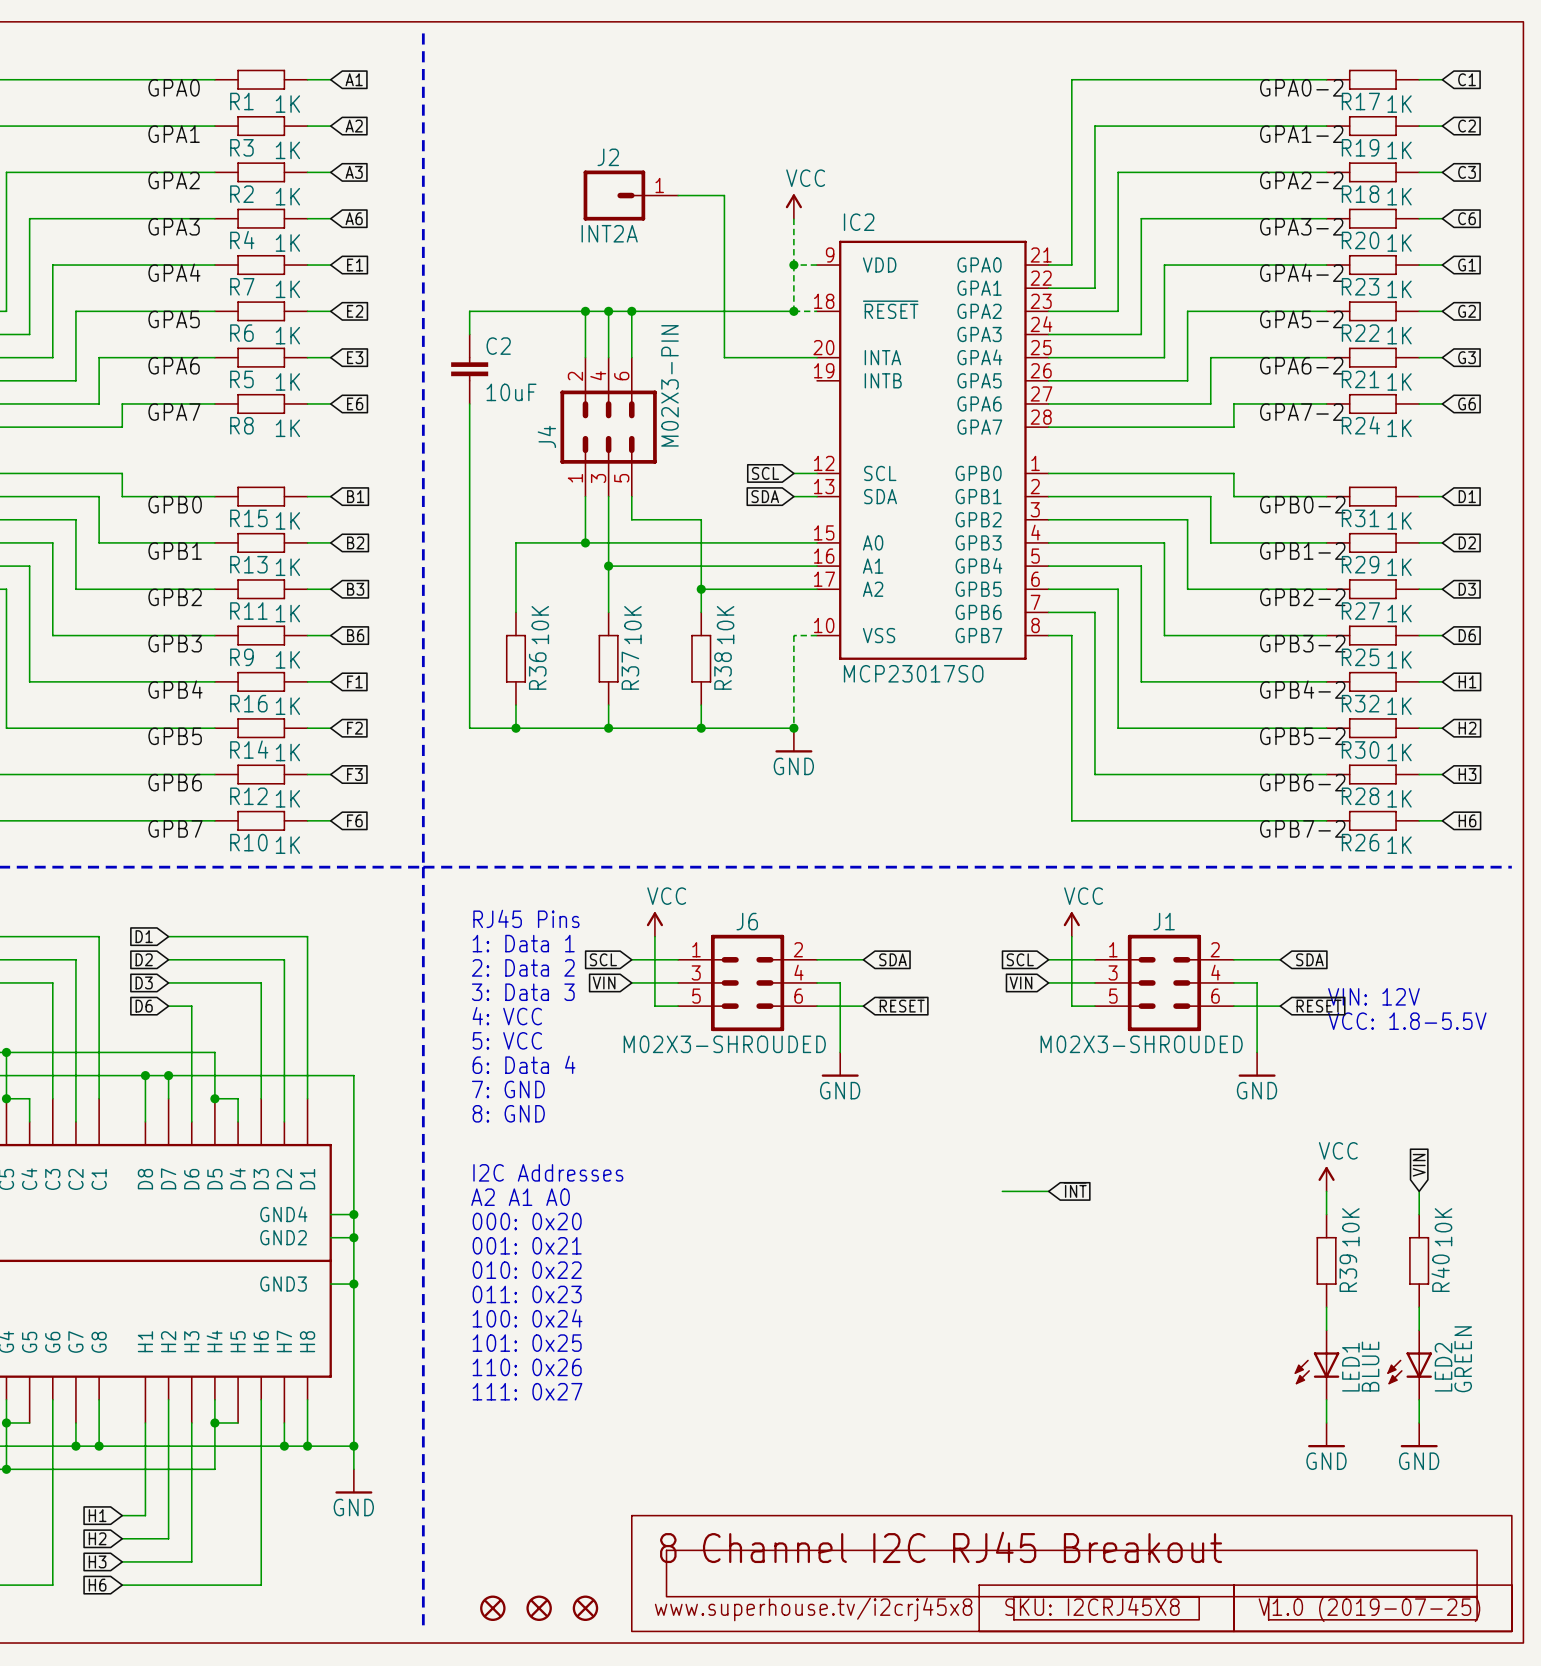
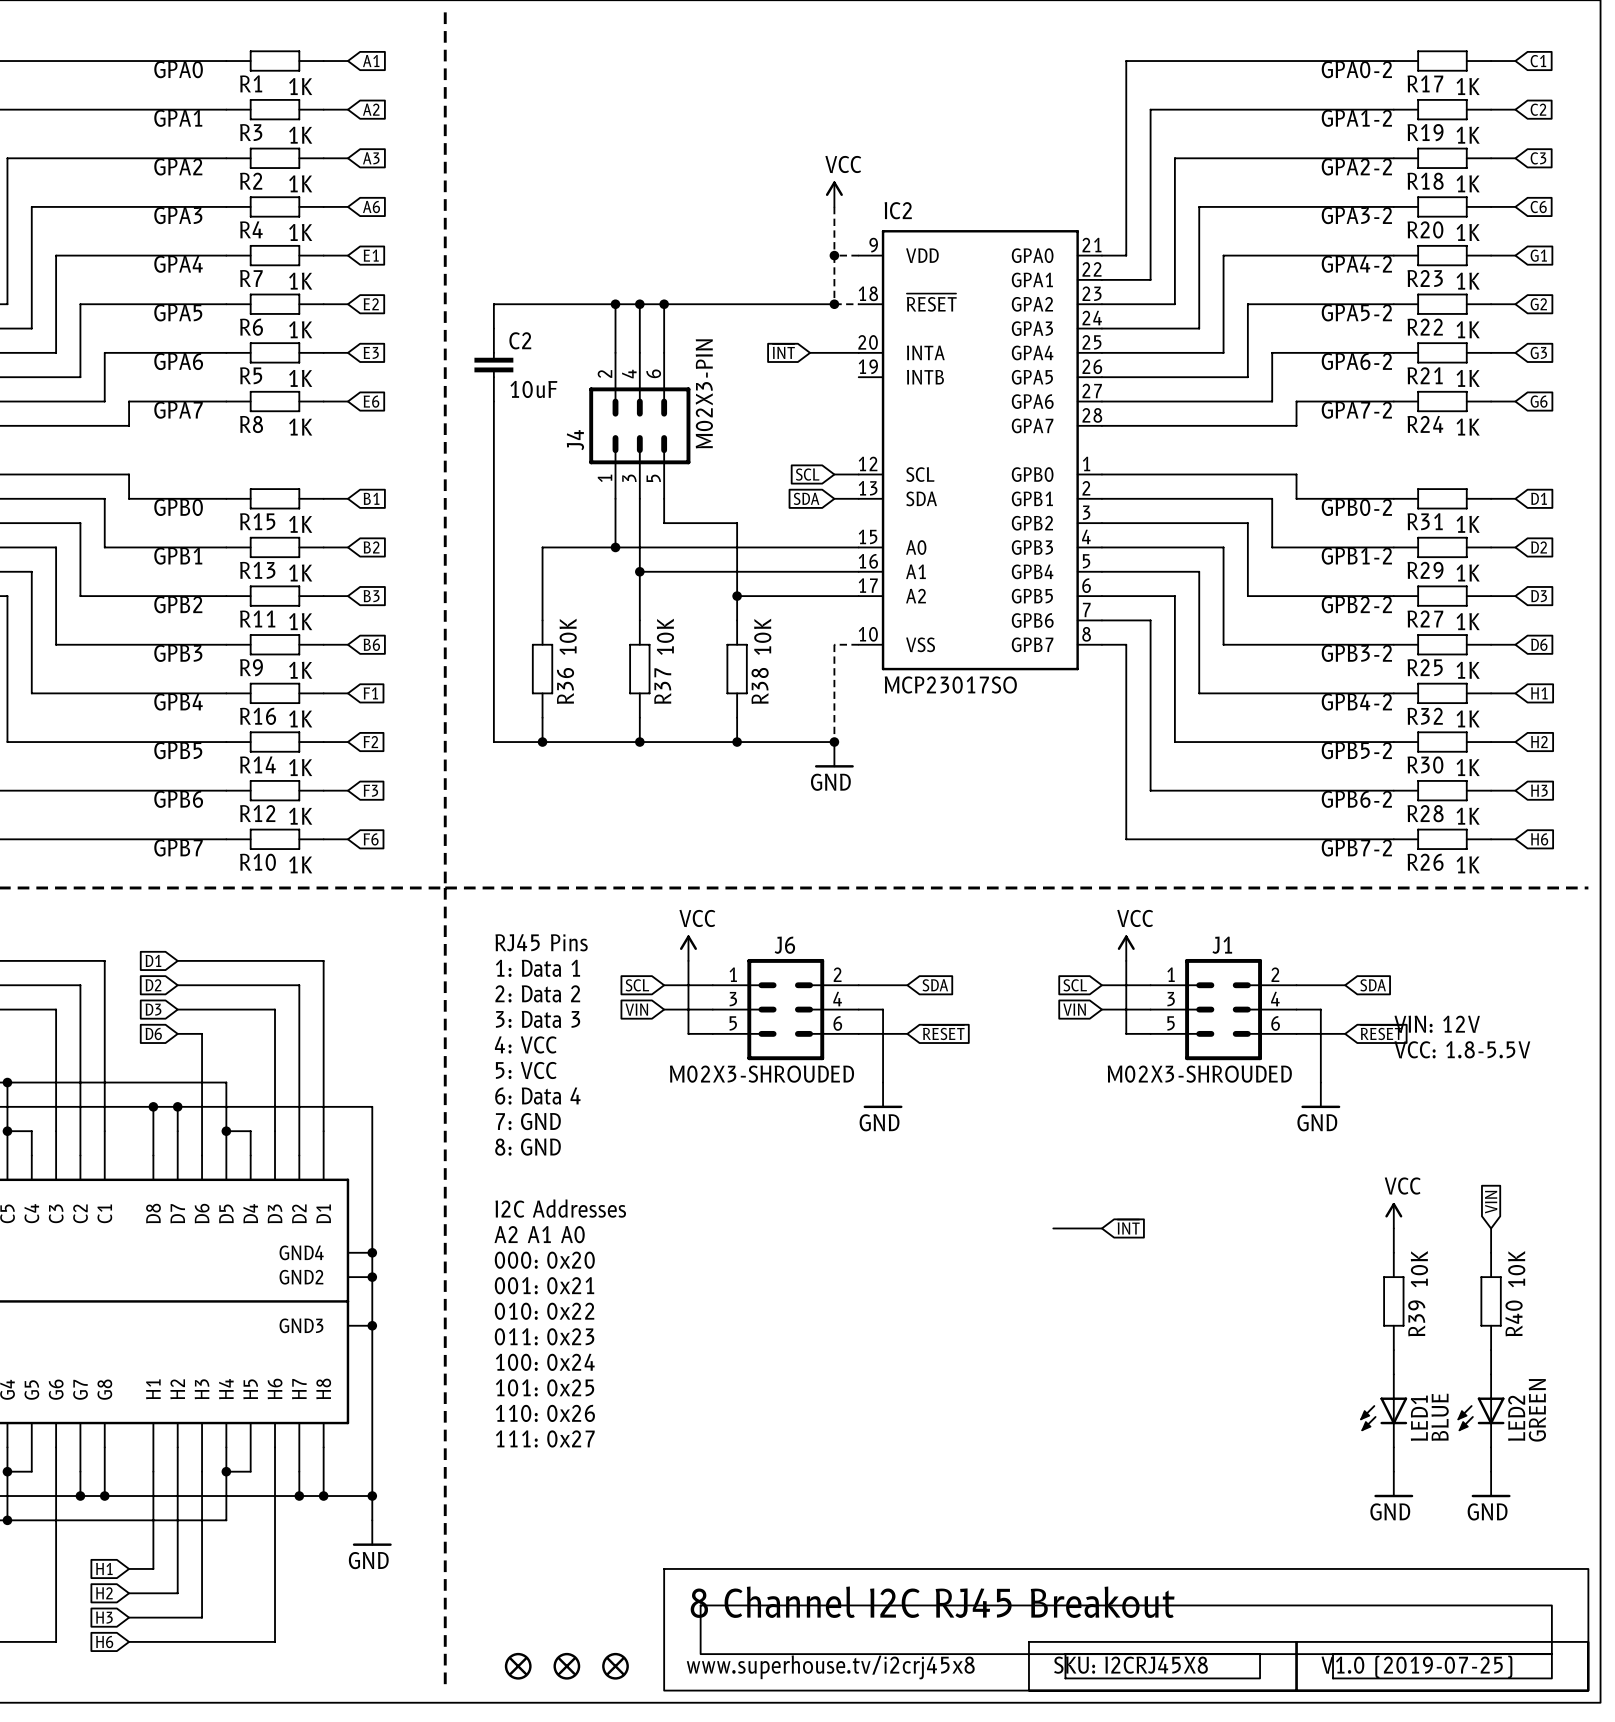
J2: INT2A (630, 195) -> none
wire: (678, 195) (724, 195) (724, 357) (770, 357) -> none
global label: none -> ~{INT} (783, 351)

